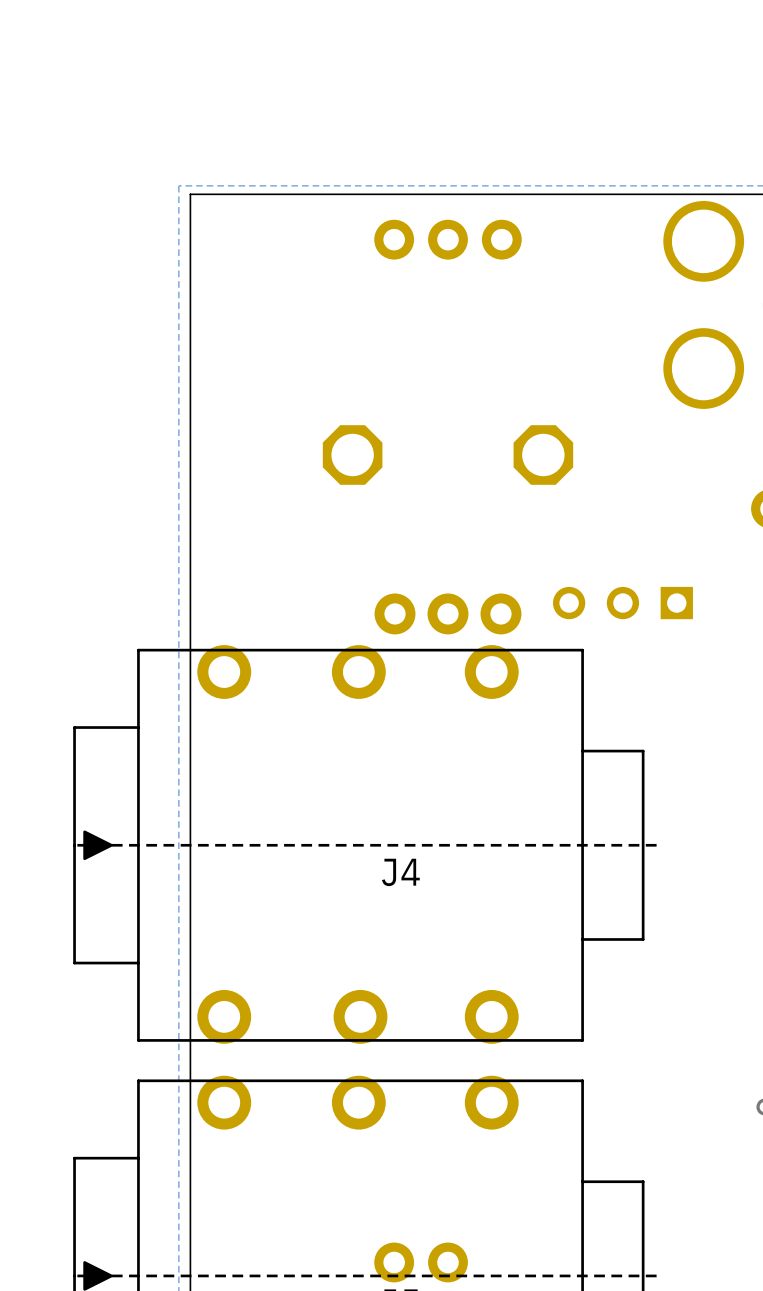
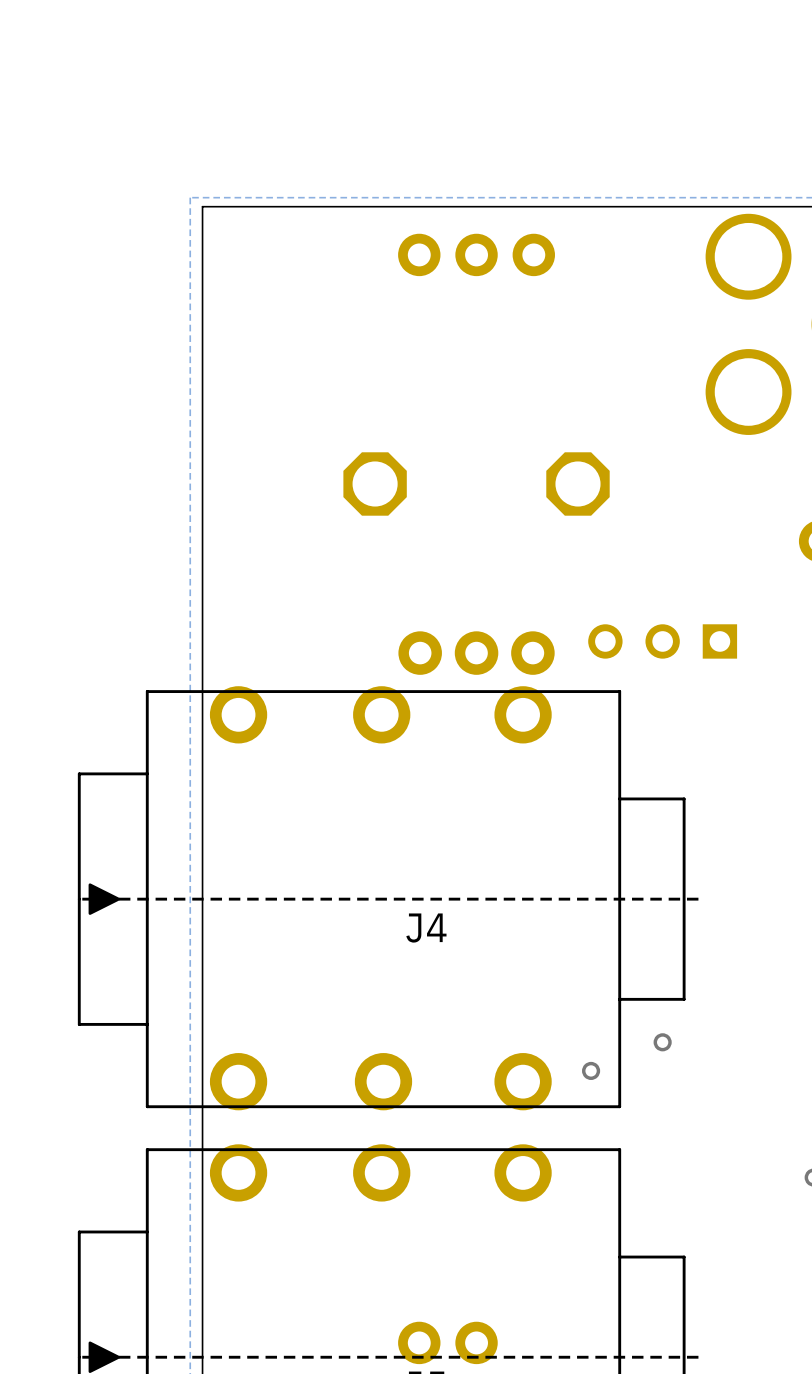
via: none -> (662, 1042)
via: none -> (591, 1070)

